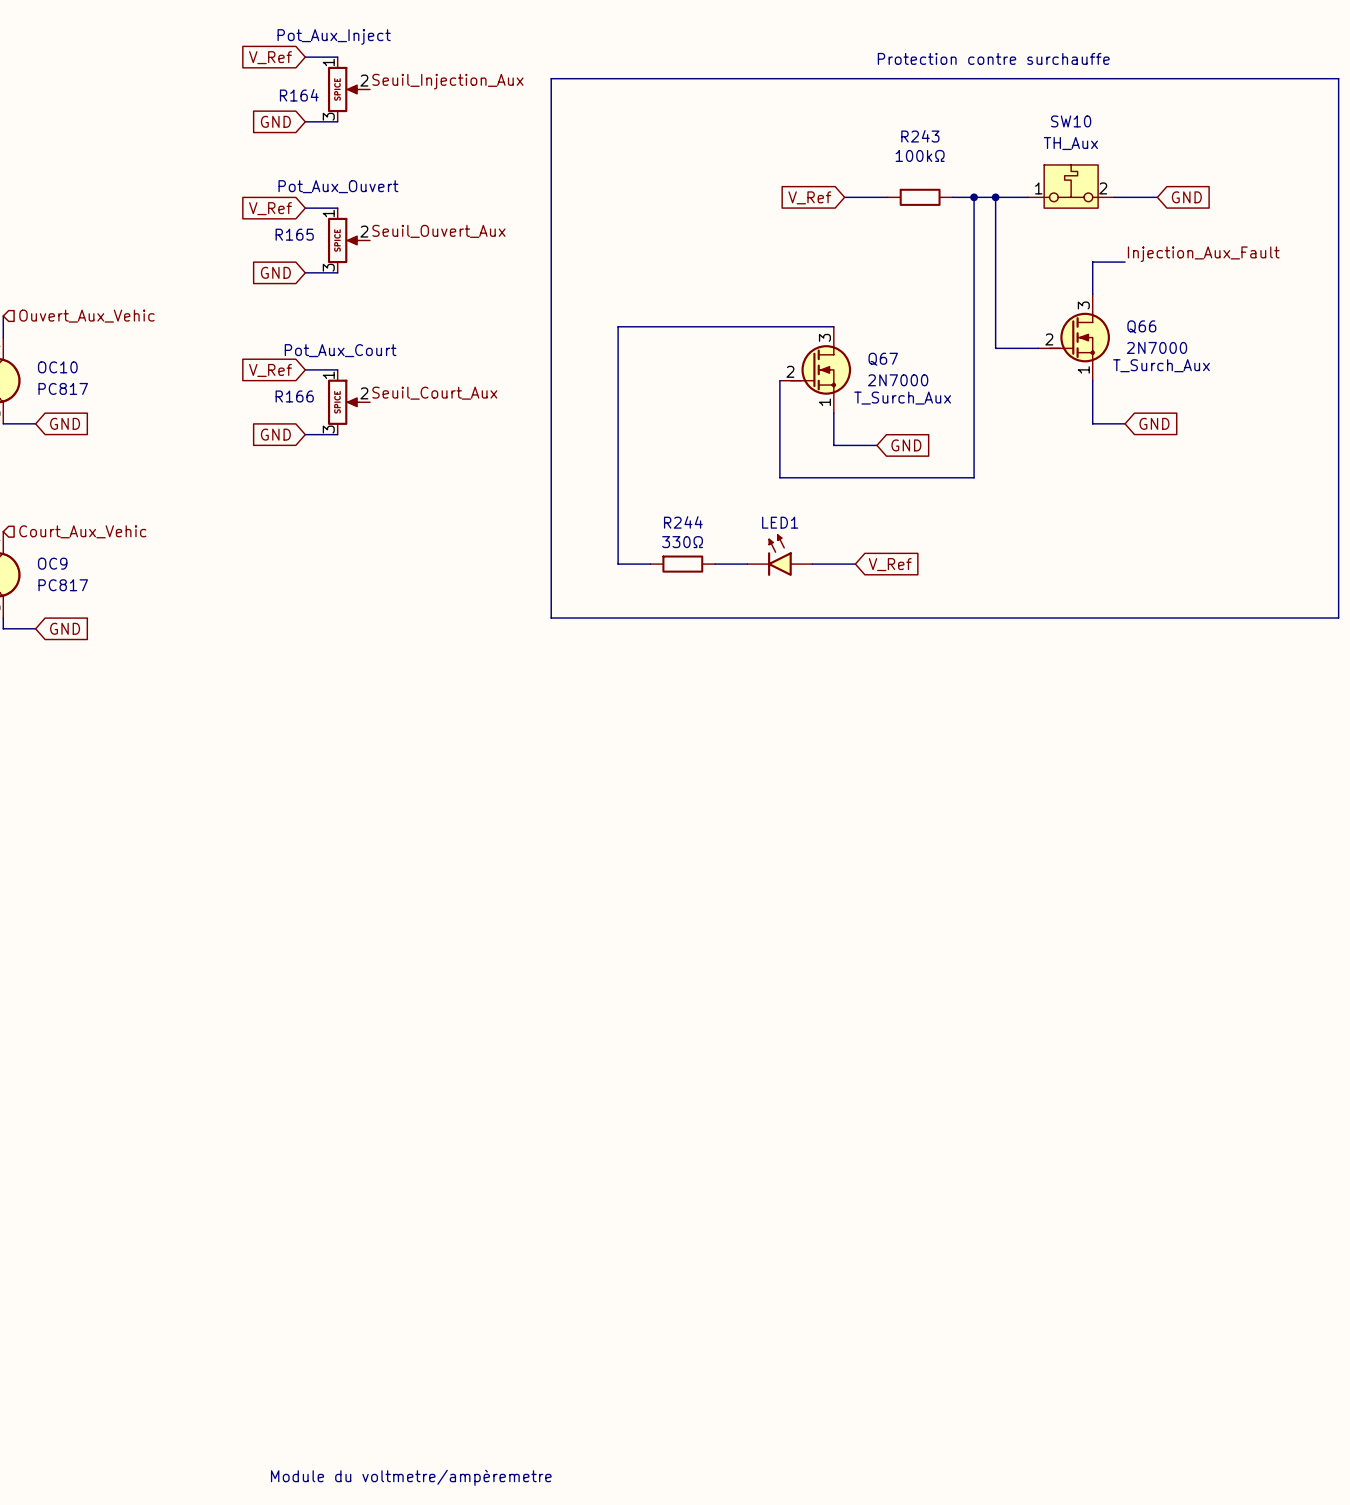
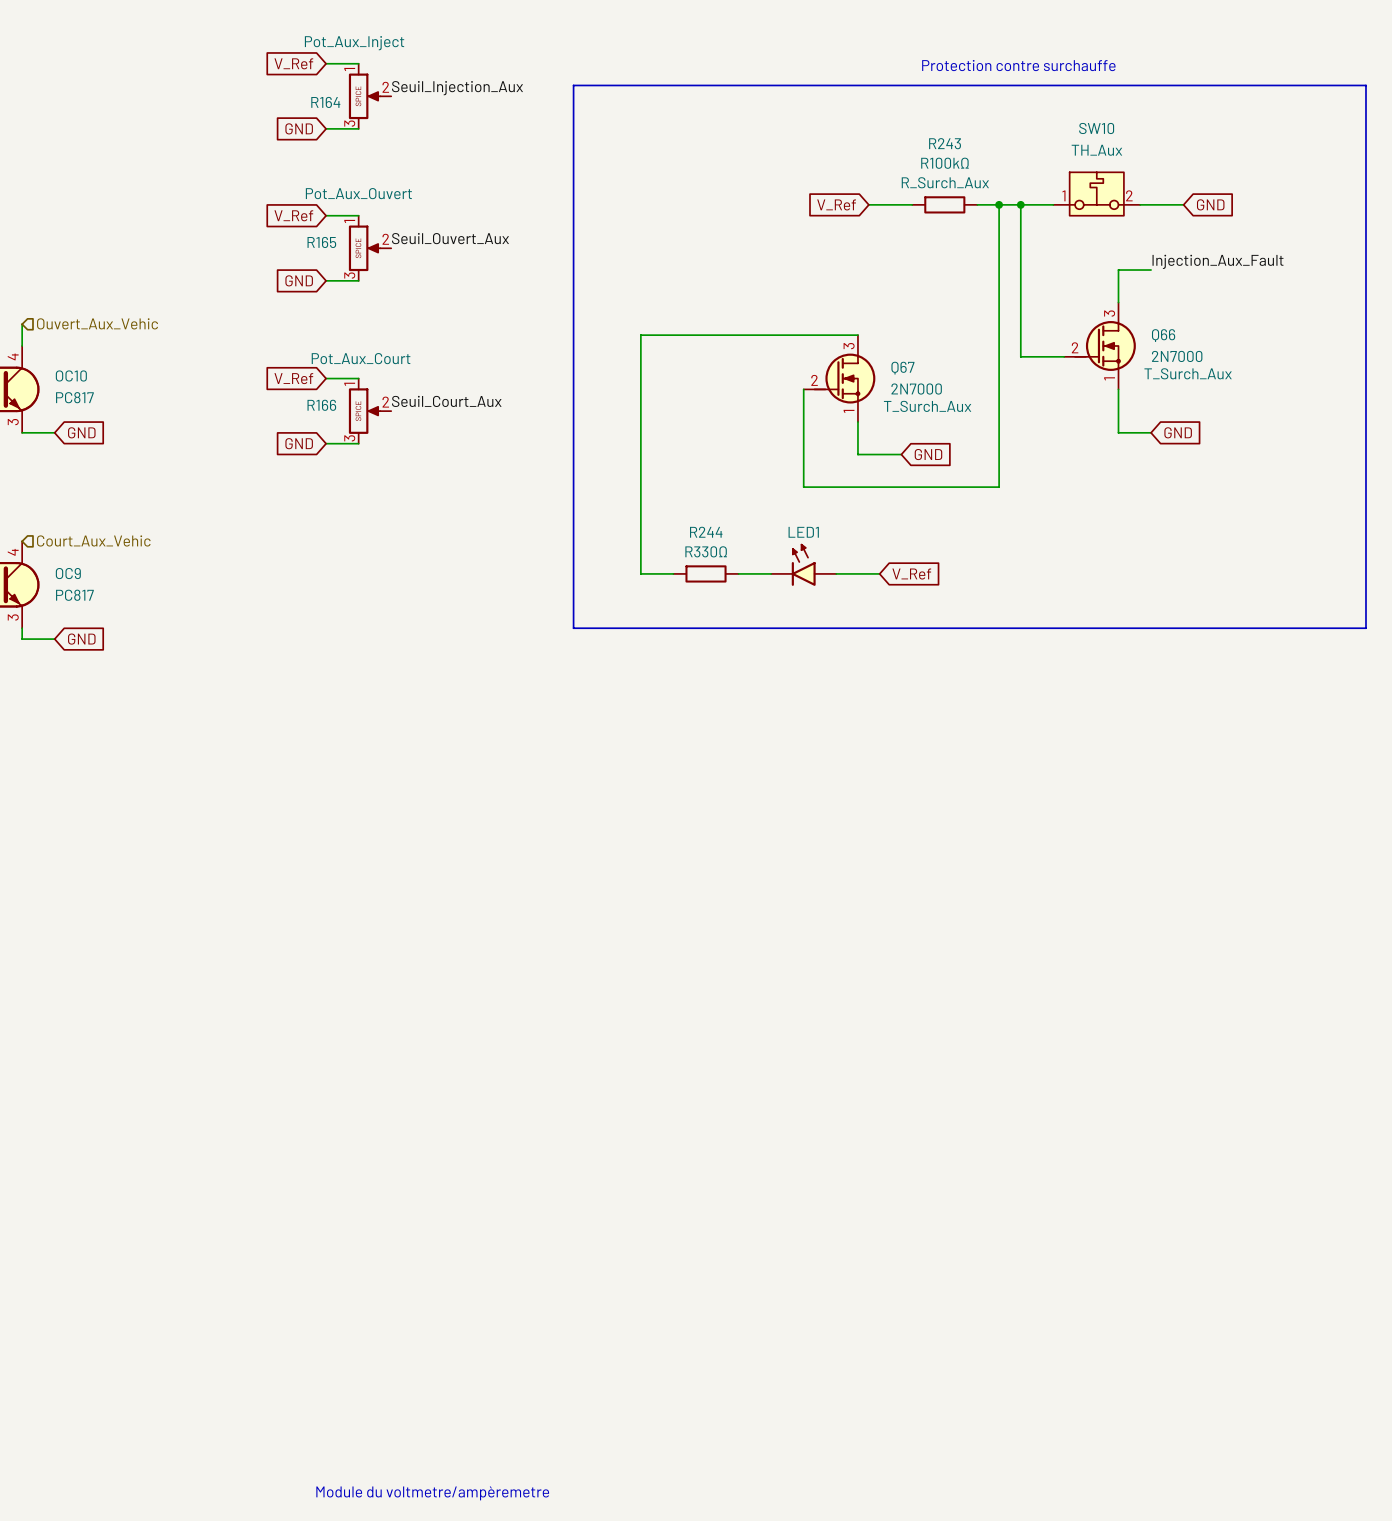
R243 value: 100kΩ (920, 155) -> R100kΩ (944, 163)
R243 text: none -> R_Surch_Aux (945, 182)
R244 value: 330Ω (682, 542) -> R330Ω (706, 551)

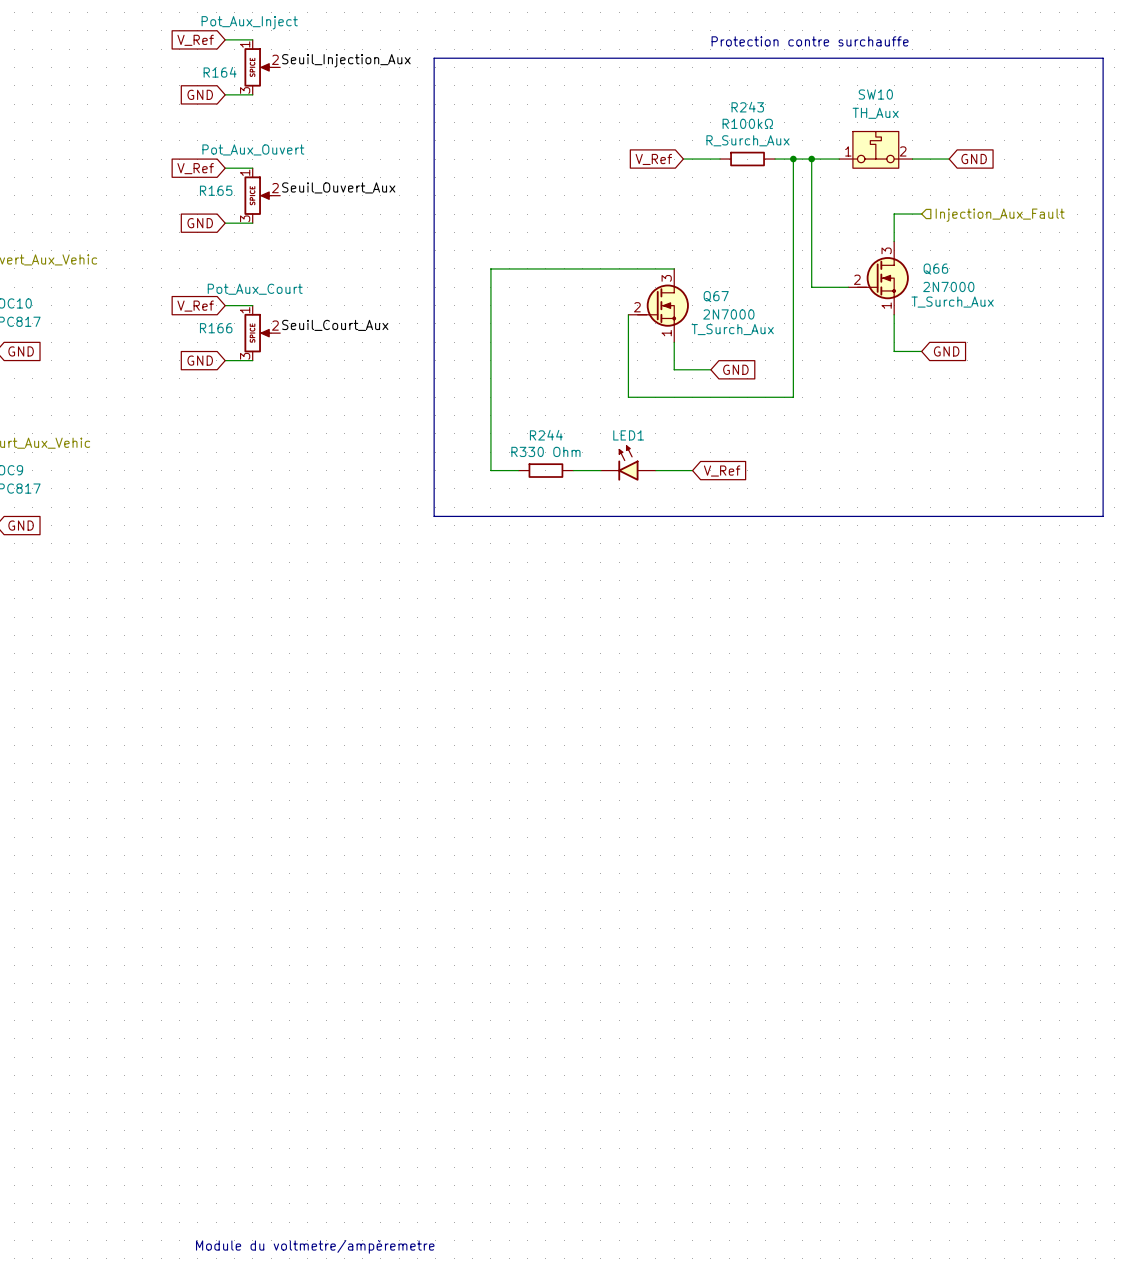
label: Injection_Aux_Fault (1218, 261) -> none
hierarchical label: none -> Injection_Aux_Fault (1000, 215)
R244 value: R330Ω (706, 551) -> R330 Ohm (545, 451)

